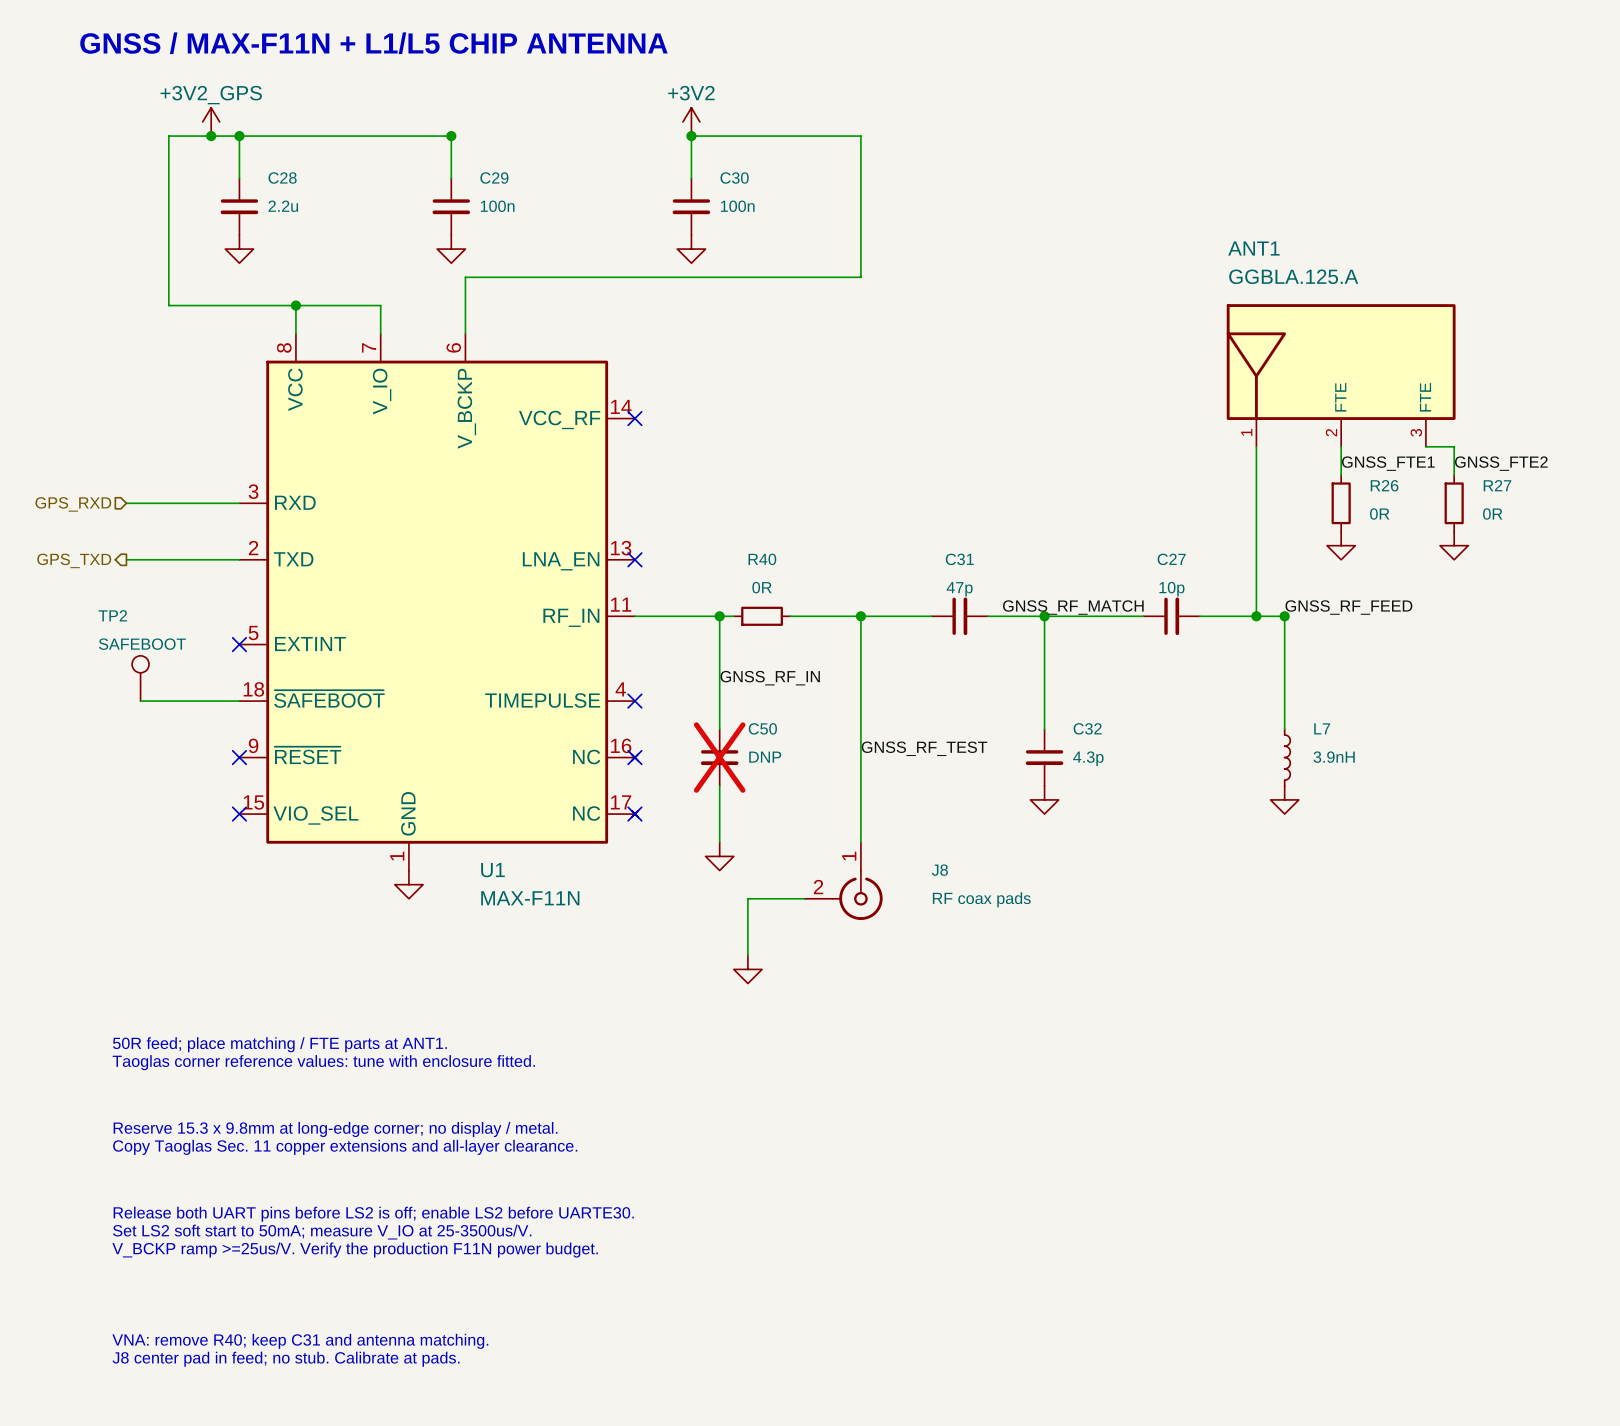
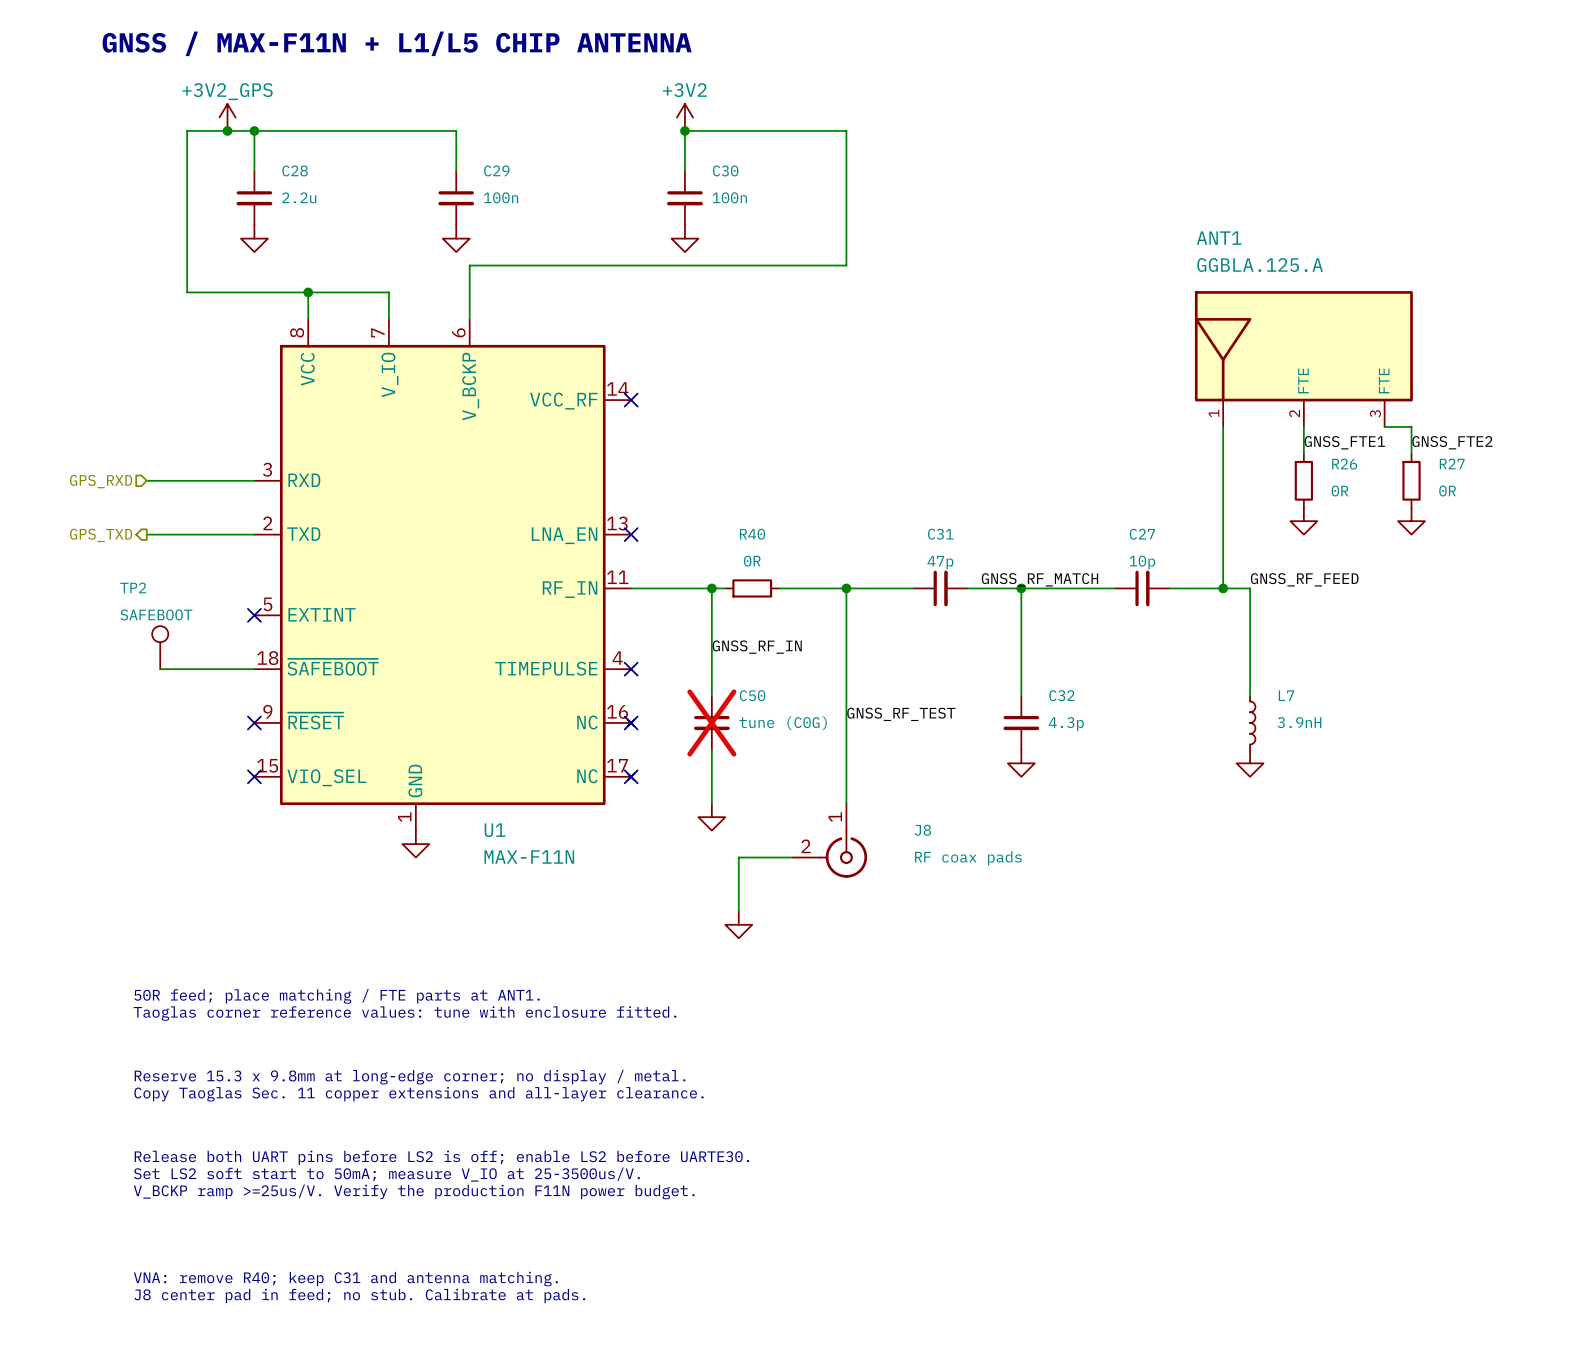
junction: (451, 136) -> none
junction: (1284, 616) -> none
C50 value: DNP (765, 757) -> tune (C0G) (783, 723)

